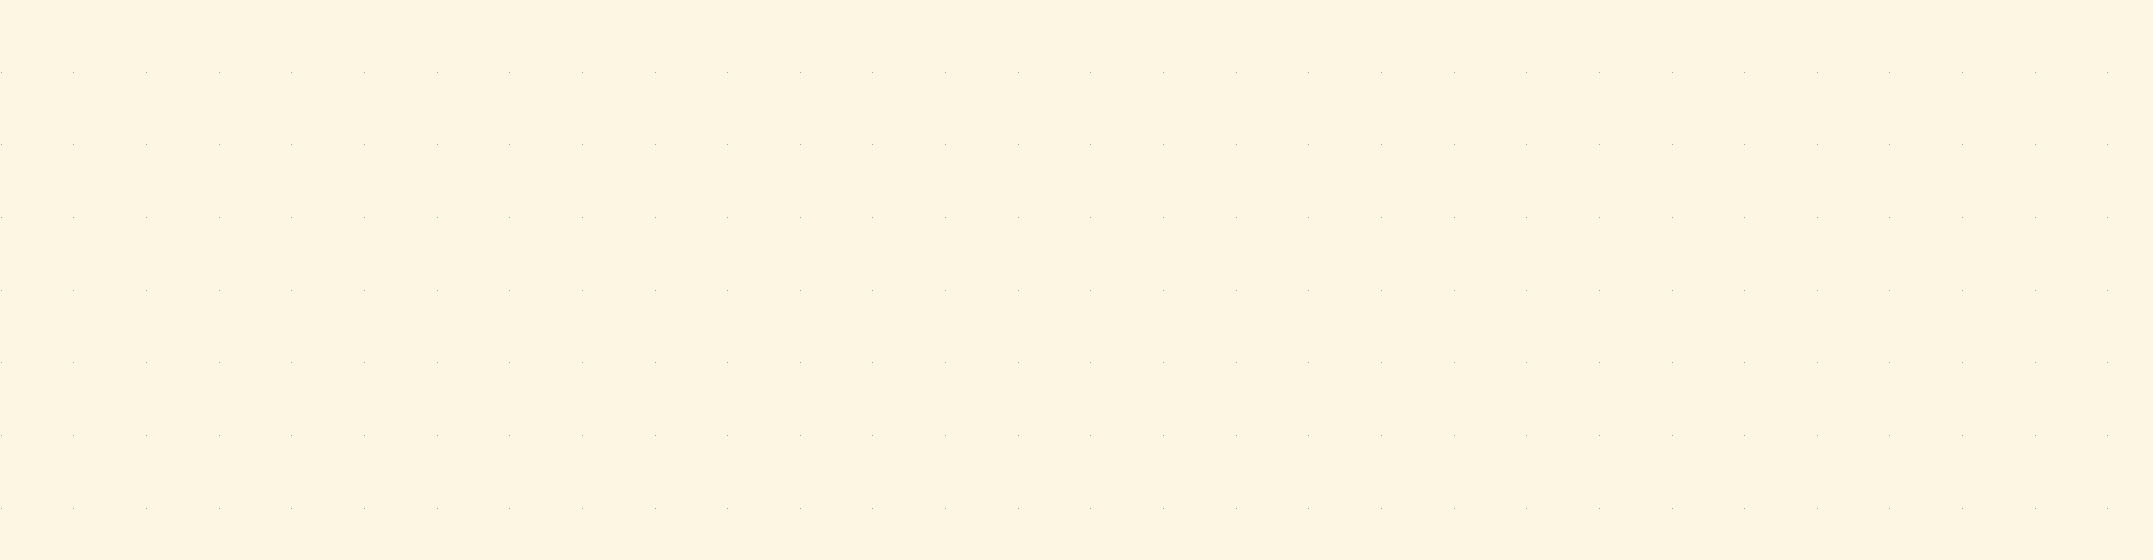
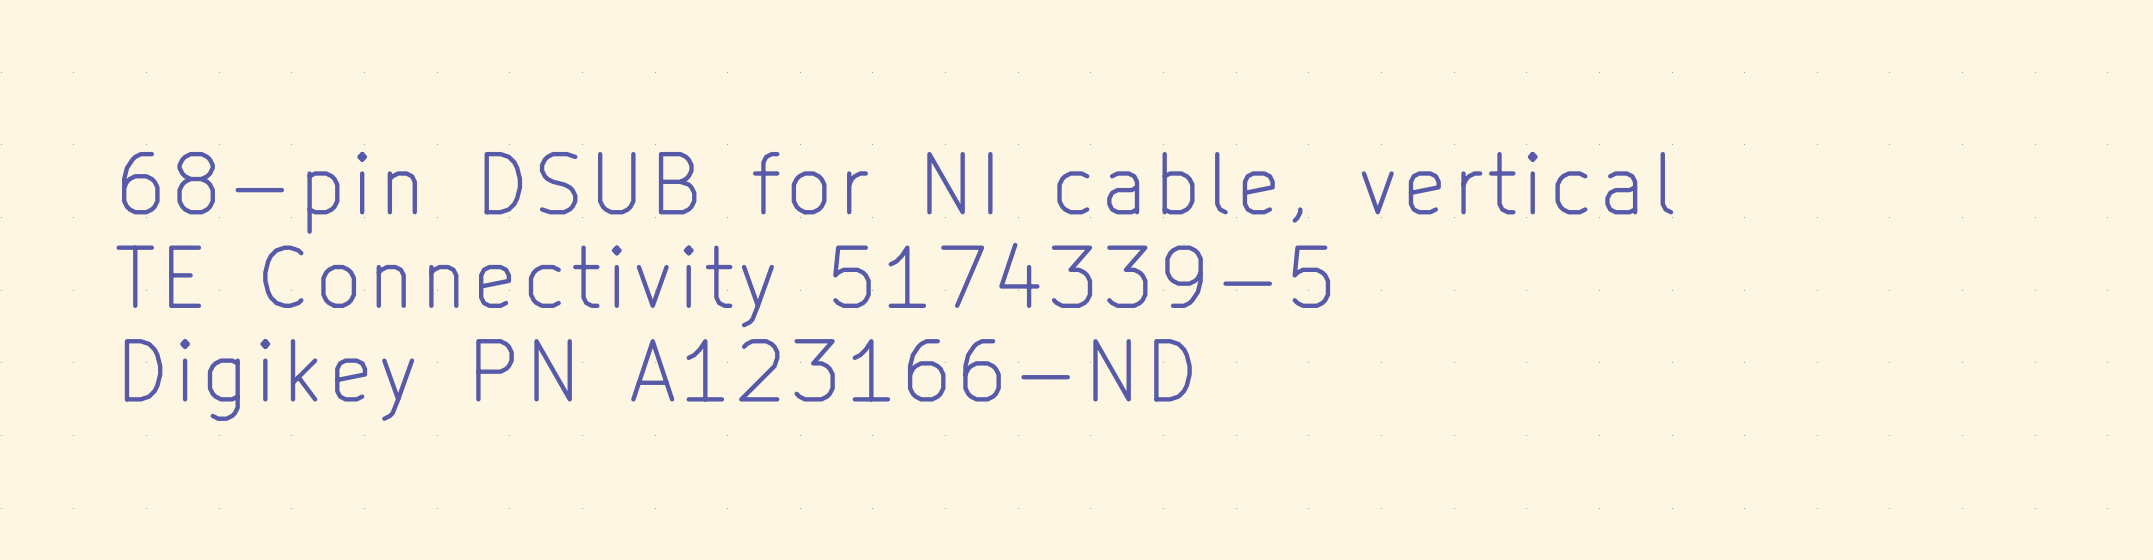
text: none -> 68-pin DSUB for NI cable, vertical (897, 192)
text: none -> TE Connectivity 5174339-5 (723, 285)
text: none -> Digikey PN A123166-ND (658, 379)

